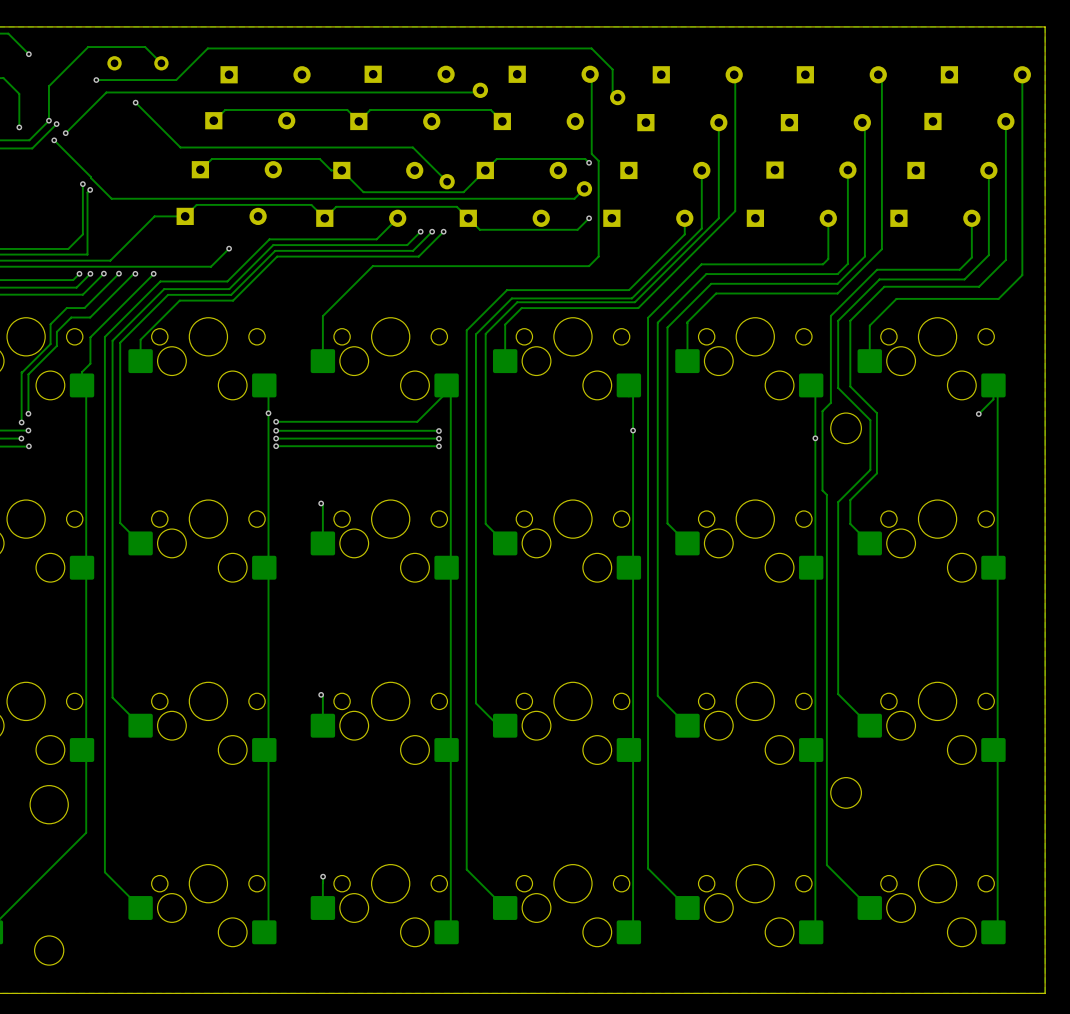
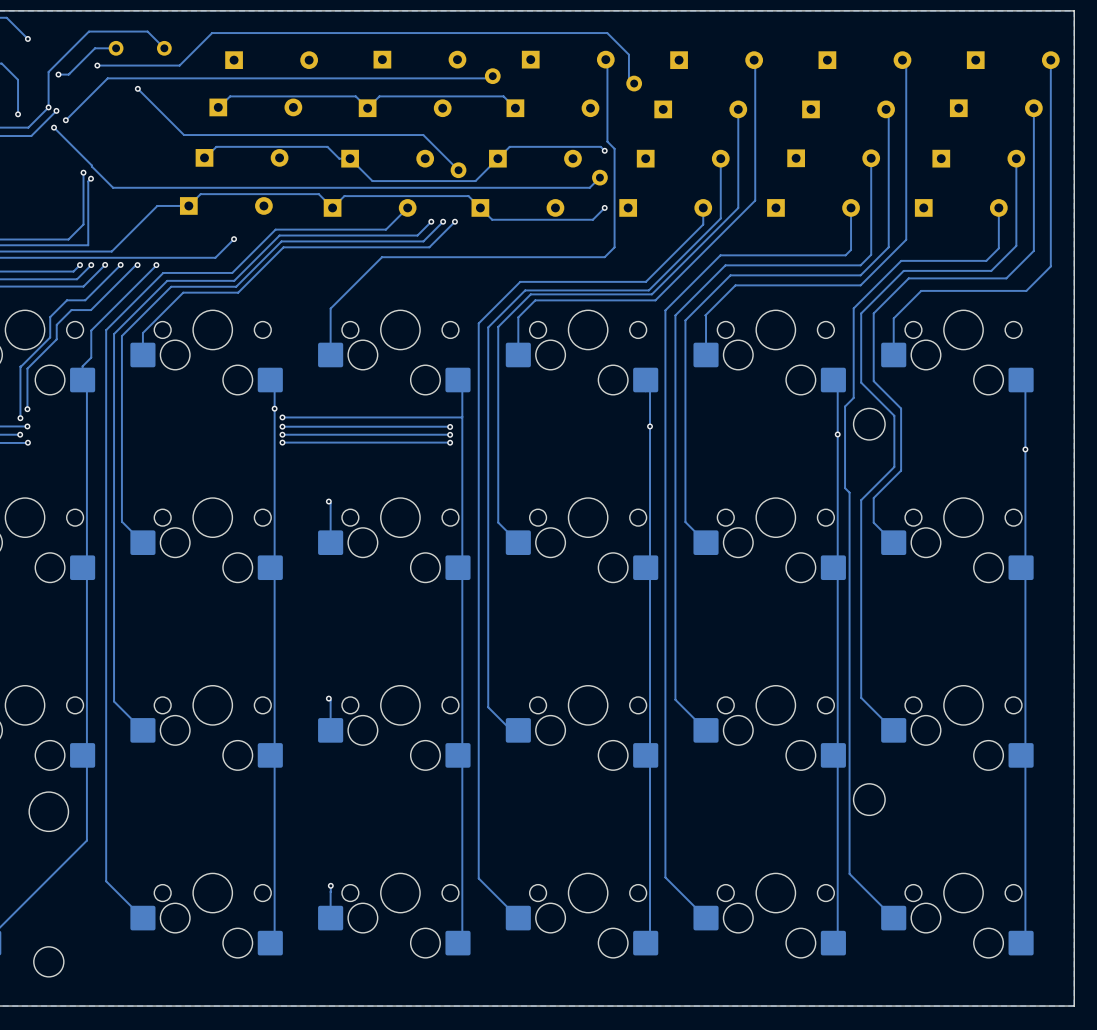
track: none -> (116, 48) (95, 48) (68, 74) (58, 74)
via: none -> (58, 74)
track: (446, 385) (446, 392) (417, 421) -> (462, 416) (427, 417)
track: (993, 385) (993, 399) (978, 414) -> none
via position: (978, 414) -> (1025, 449)

